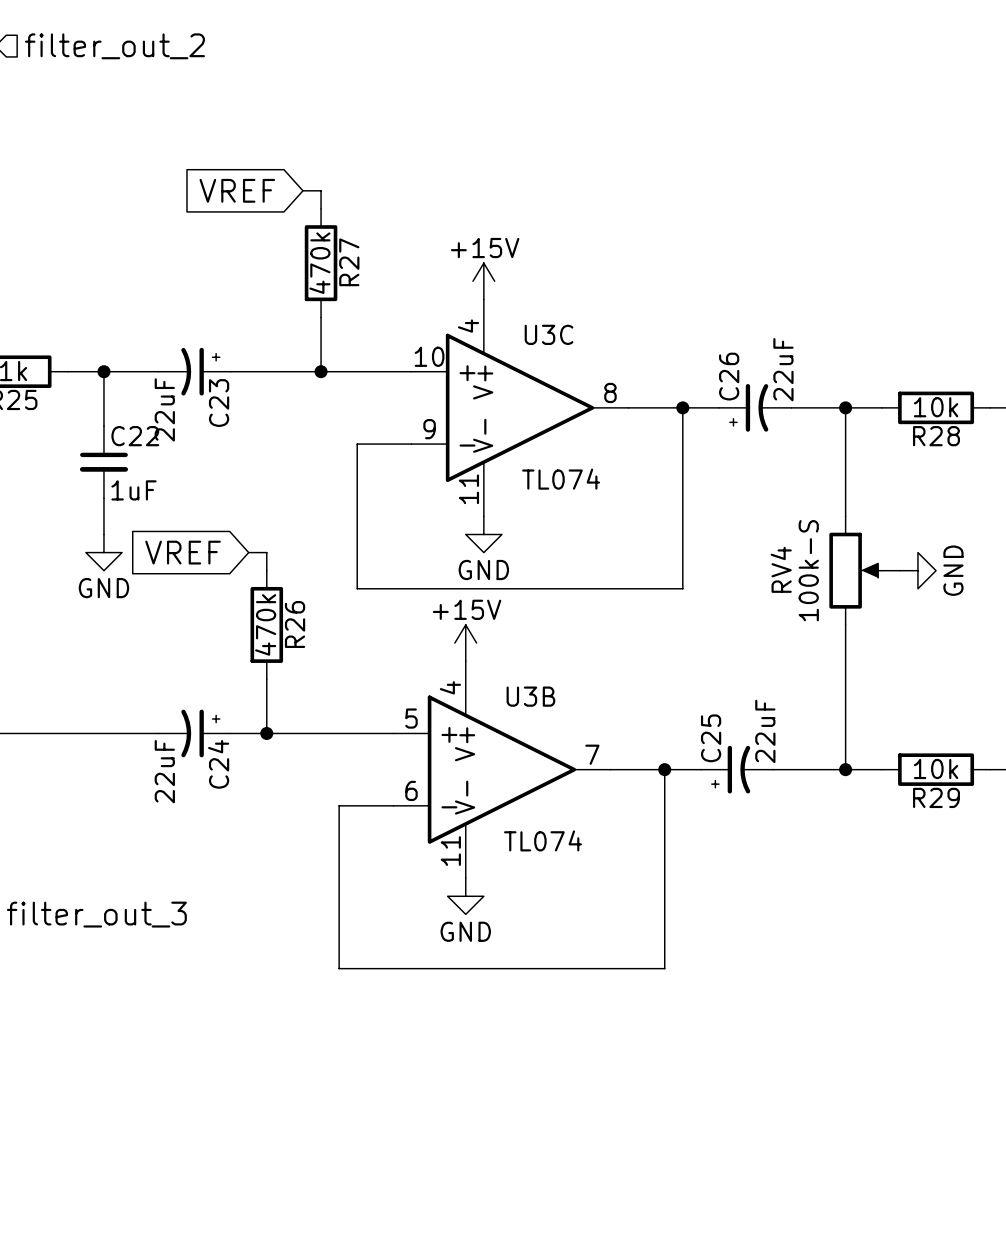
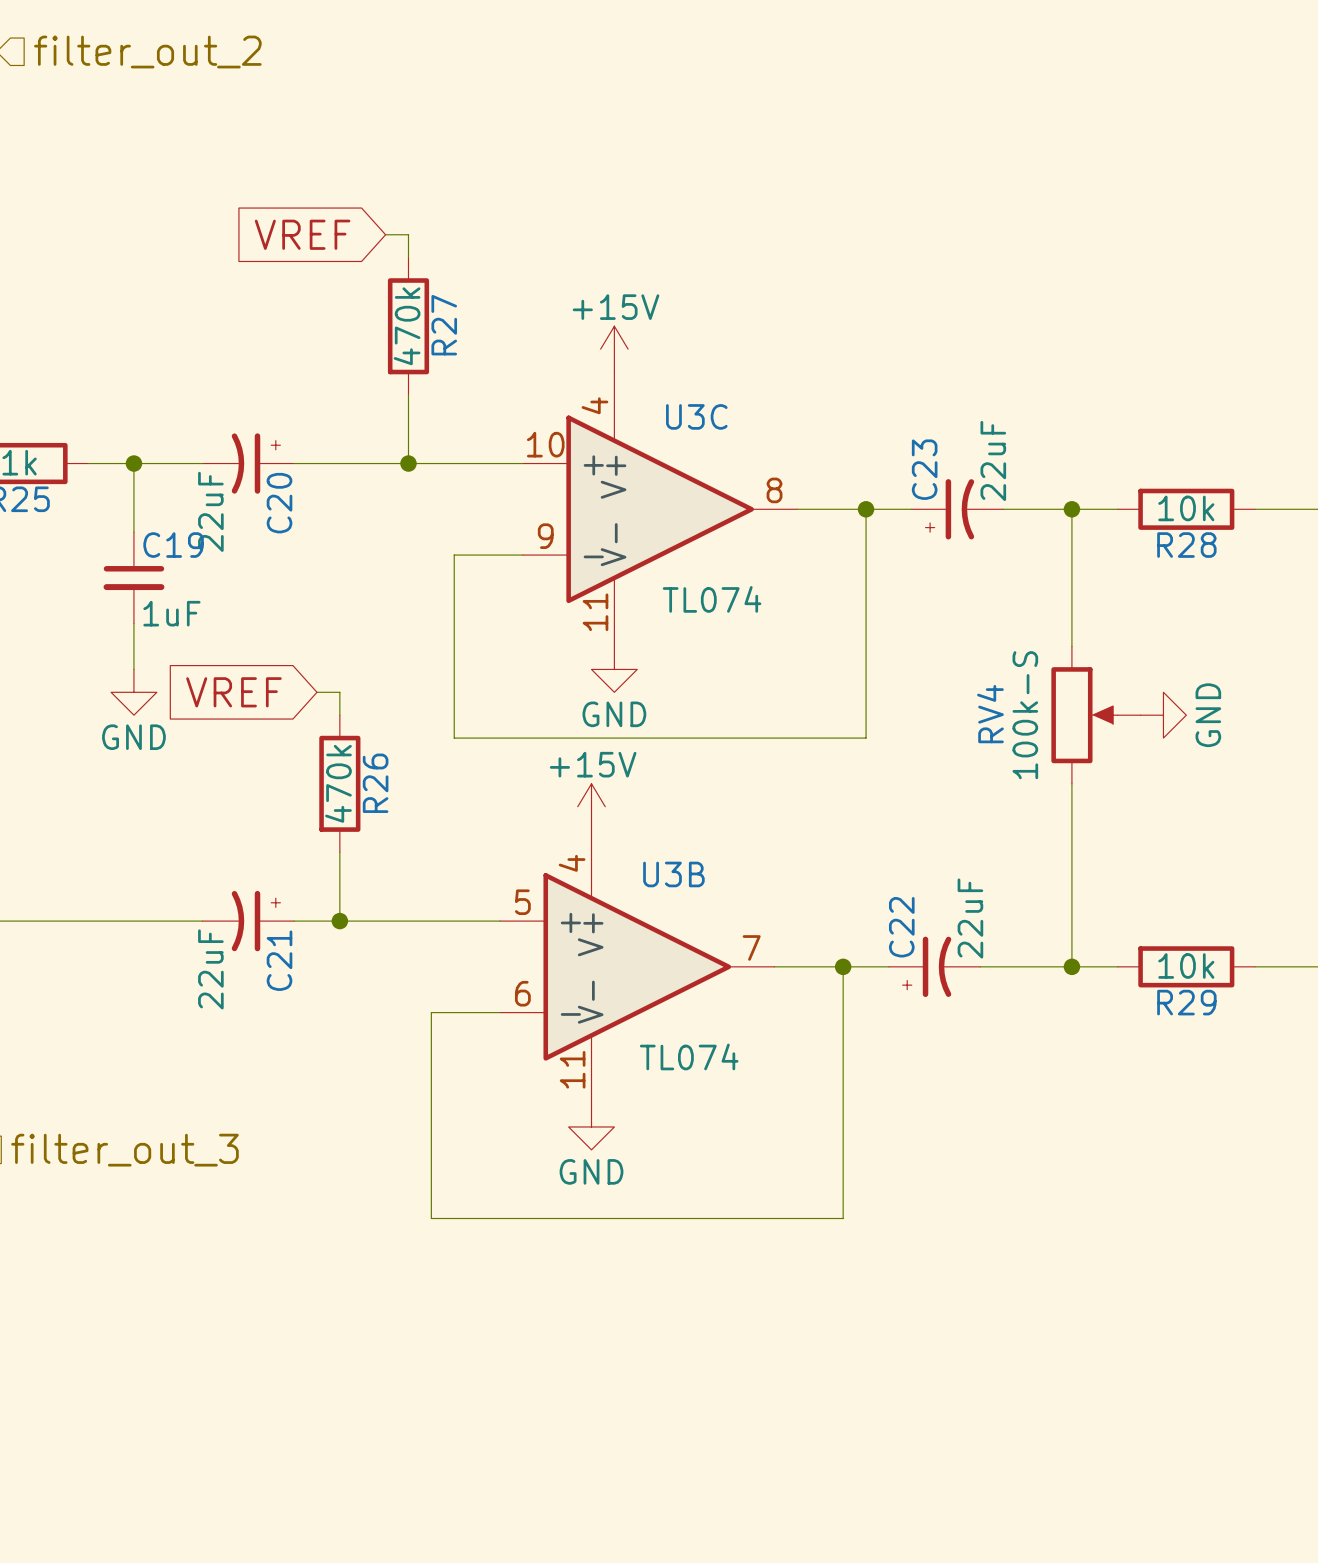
C26 name: C26 (729, 376) -> C23 (924, 469)
C23 name: C23 (219, 403) -> C20 (279, 503)
C22 name: C22 (135, 436) -> C19 (173, 545)
C25 name: C25 (711, 738) -> C22 (901, 927)
C24 name: C24 (218, 764) -> C21 (279, 960)

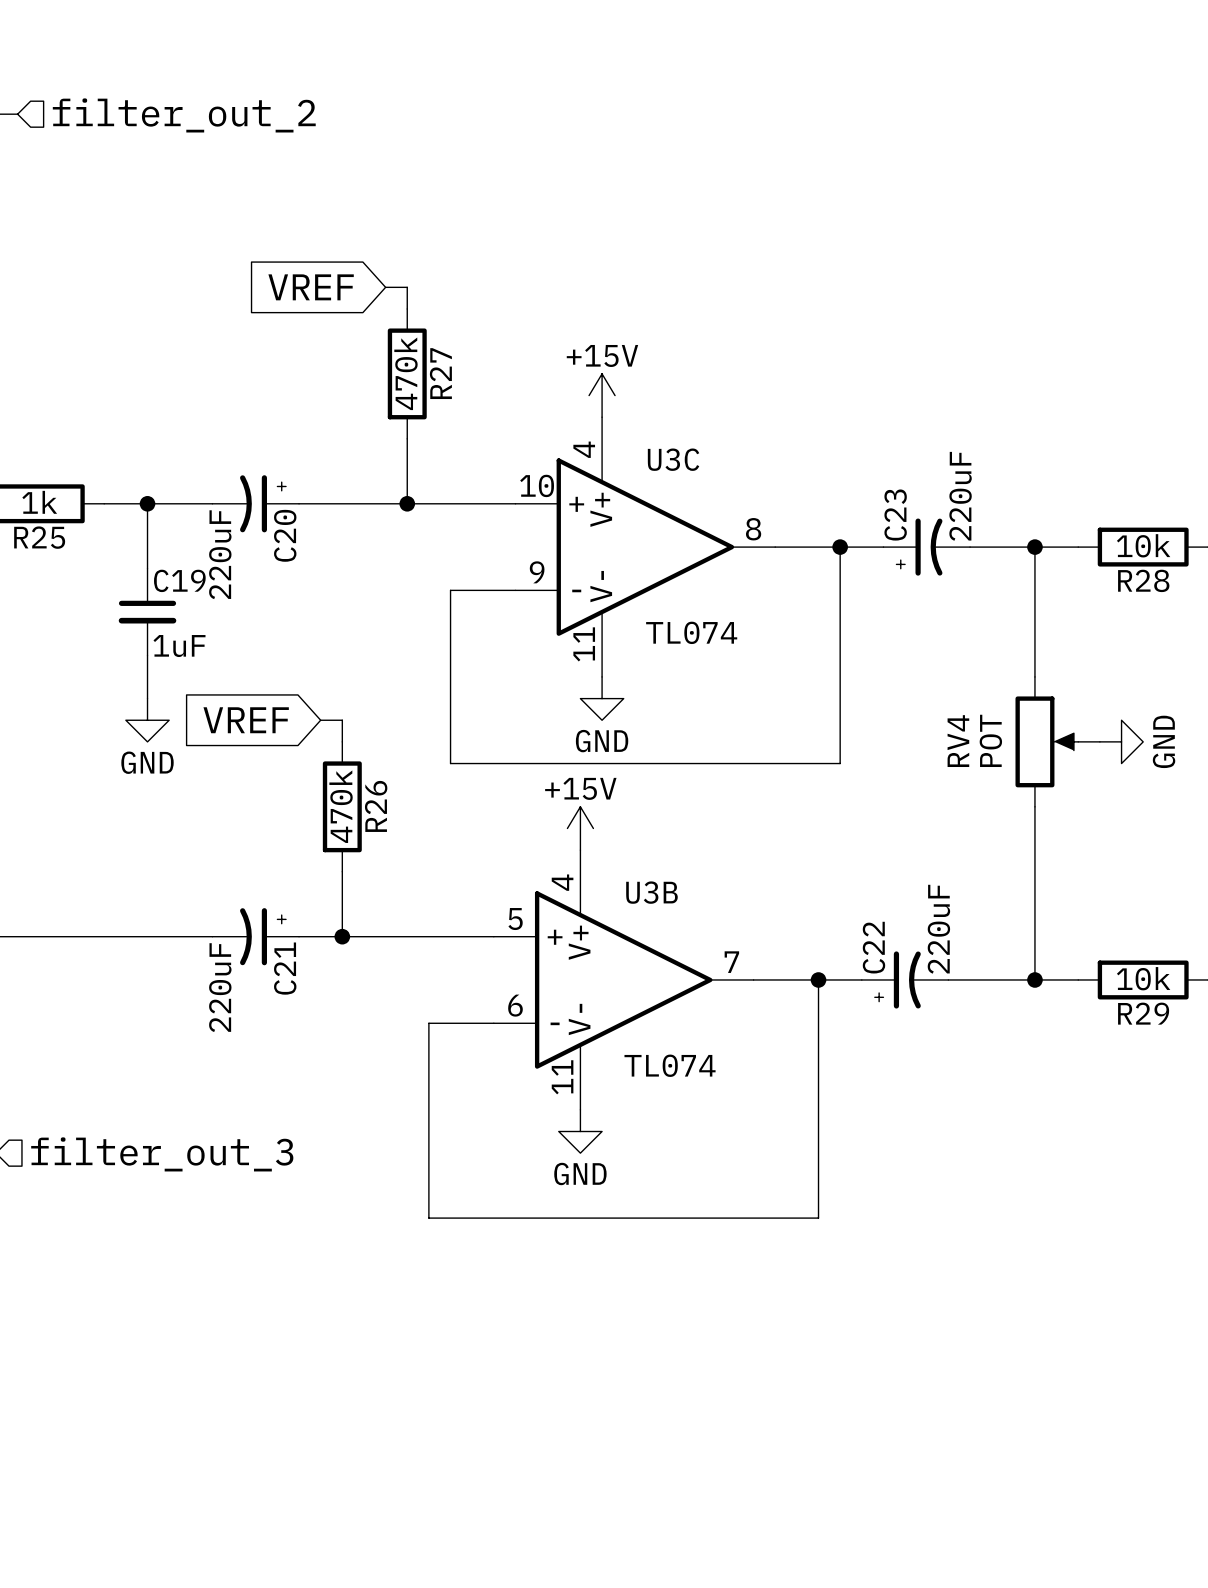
C23 value: 22uF (993, 460) -> 220uF (960, 496)
C20 value: 22uF (210, 511) -> 220uF (220, 554)
RV4 value: 100k-S (1025, 715) -> POT (990, 740)
C22 value: 22uF (970, 918) -> 220uF (938, 929)
C21 value: 22uF (210, 969) -> 220uF (220, 987)

